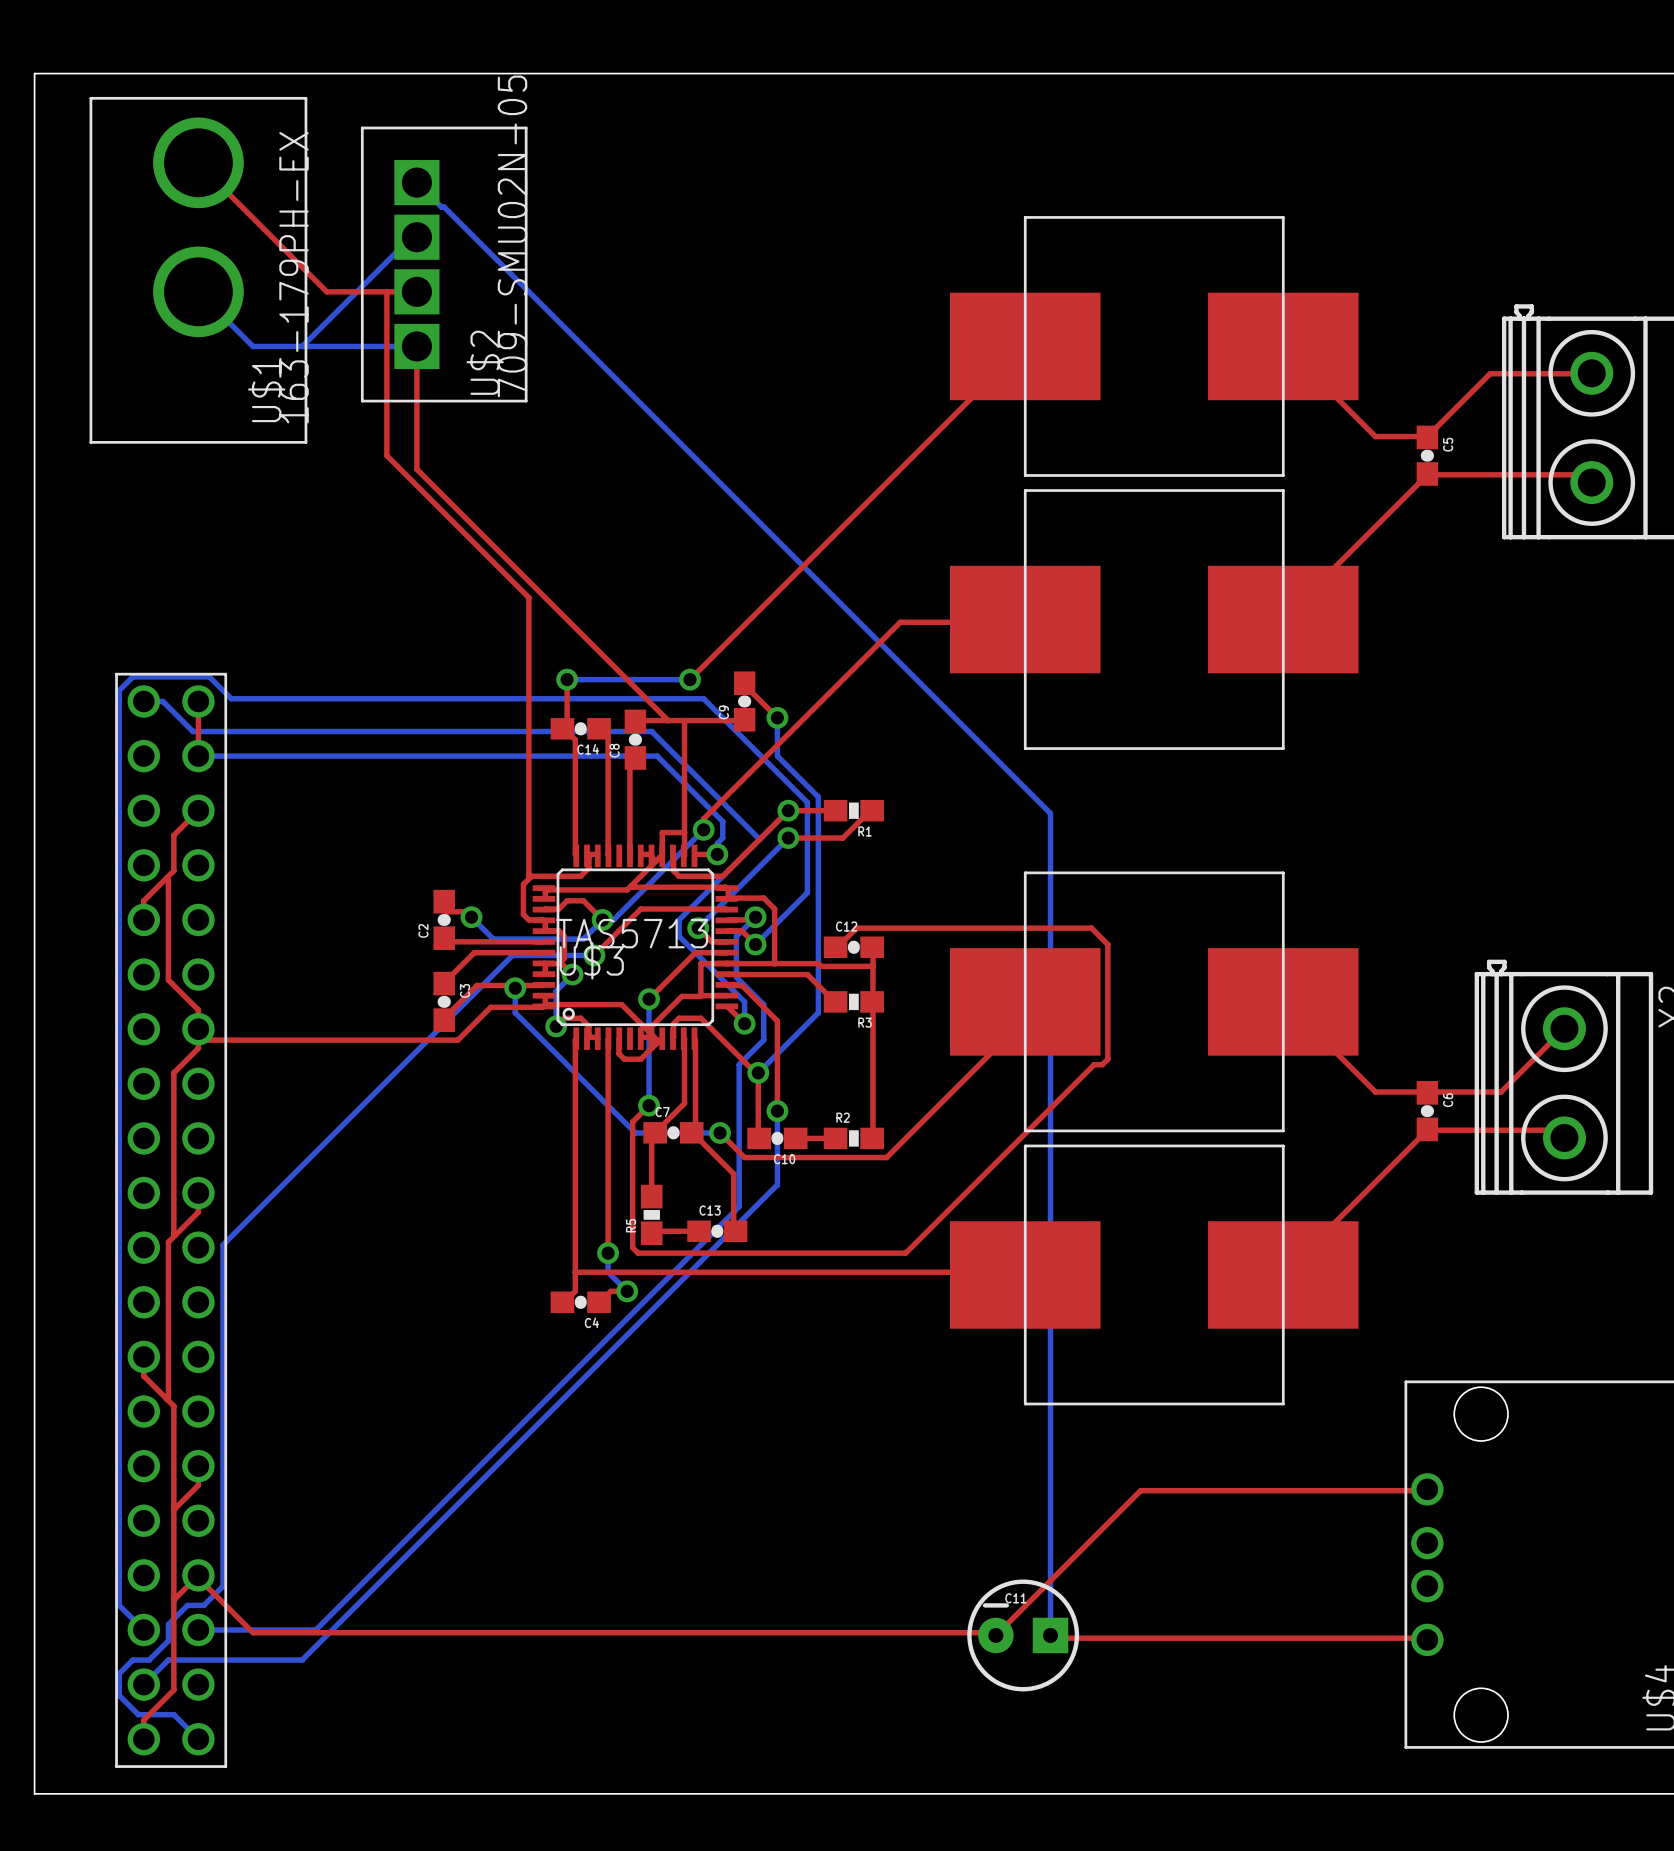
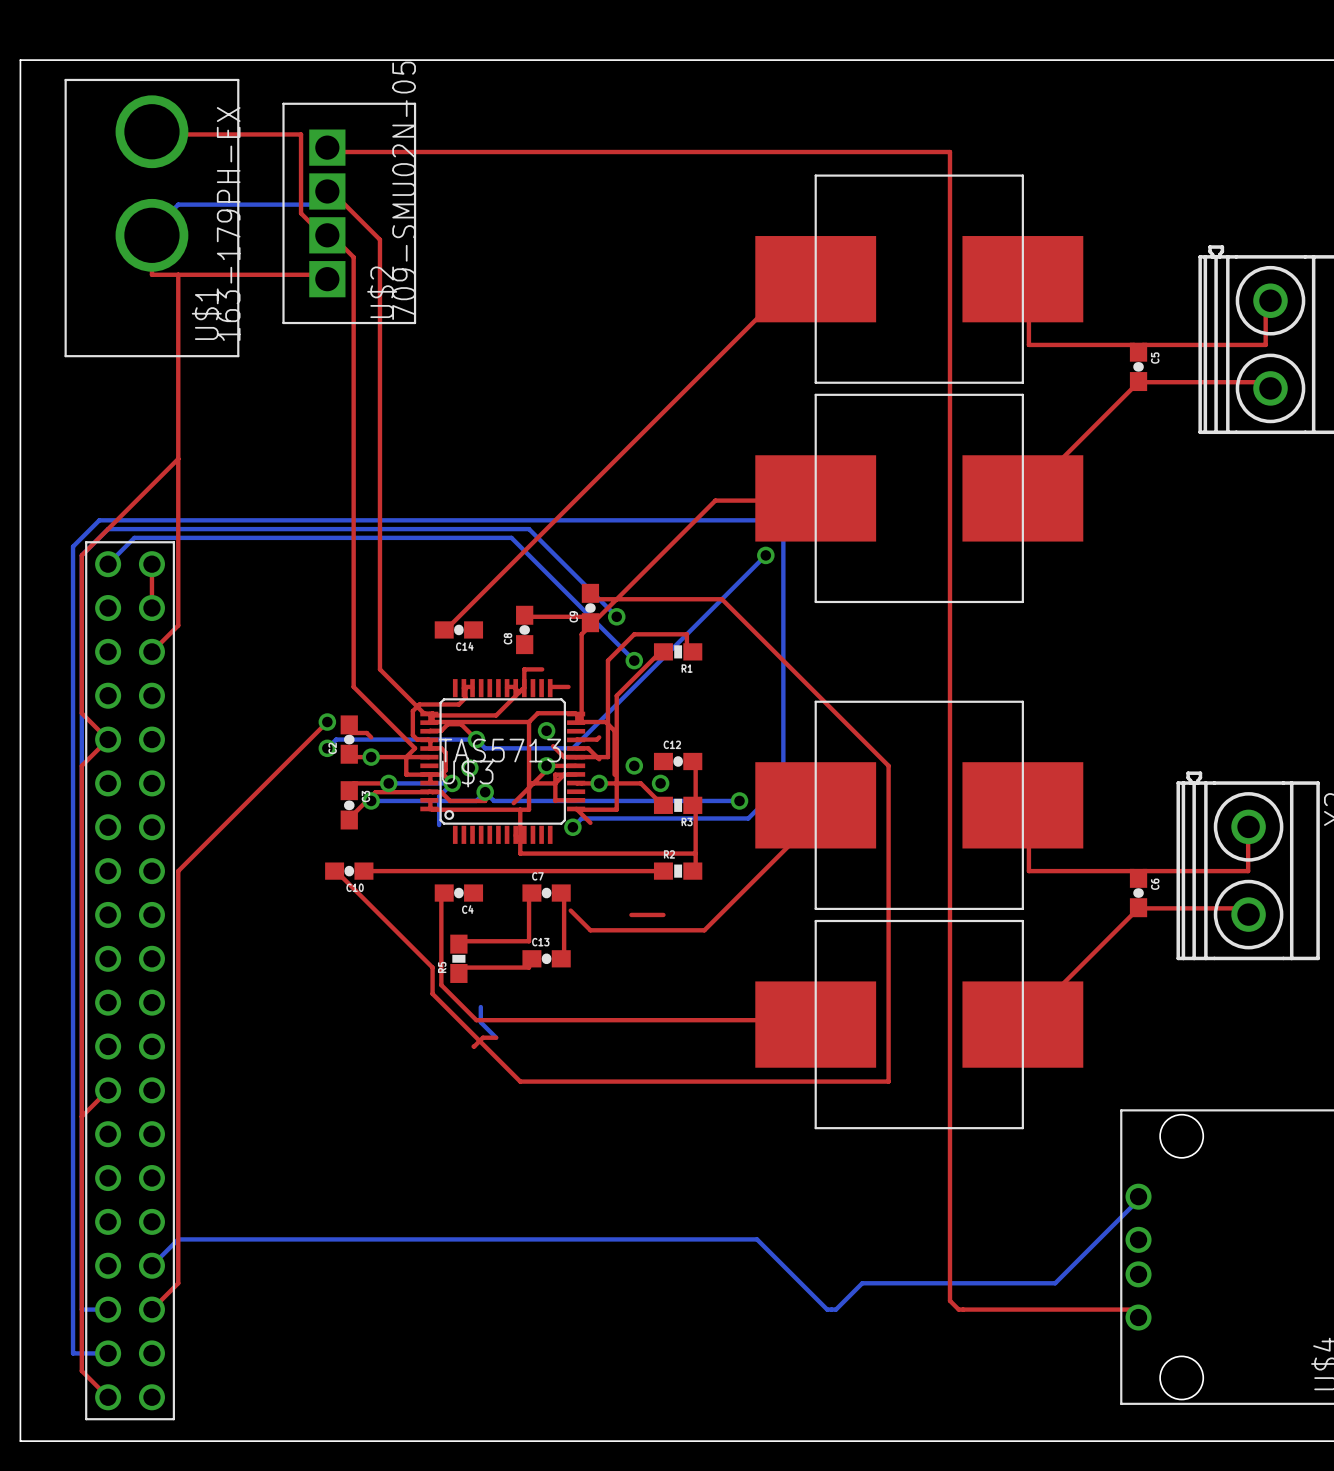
top track: (198, 163) (326, 291) (416, 291) -> (151, 132) (151, 134) (301, 134) (301, 213) (327, 239) (327, 230) (353, 257) (353, 686) (415, 748) (406, 757) (406, 774) (429, 774)
bottom track: (416, 182) (441, 207) (444, 207) (1050, 813) (1050, 1635) -> none
top track: none -> (327, 191) (327, 187) (379, 239) (379, 669) (423, 713) (432, 713) (432, 722) (529, 722)
bottom track: (416, 237) (411, 237) (302, 346) -> none
bottom track: (198, 291) (253, 346) (416, 346) -> (151, 235) (151, 230) (178, 204) (318, 204) (327, 195) (327, 191)
top track: (386, 291) (386, 455) (528, 597) (530, 877) -> none
top track: (416, 346) (416, 469) (668, 720) -> (327, 279) (327, 274) (151, 274) (151, 235)
top track: (1025, 346) (690, 679) -> (815, 279) (809, 283) (792, 283) (444, 629)
top track: (1283, 346) (1375, 436) (1427, 436) (1490, 373) (1591, 373) -> (1022, 279) (1028, 283) (1028, 344) (1134, 344) (1138, 352) (1142, 344) (1265, 344) (1265, 301) (1270, 300)
top track: (567, 679) (567, 728) (562, 728) -> none
bottom track: (567, 679) (690, 679) -> none
via: (567, 679) -> none
via: (690, 679) -> none
top track: (744, 683) (777, 717) -> none
bottom track: none -> (765, 555) (572, 748) (485, 748) (476, 739) (336, 739) (327, 748)
via: none -> (765, 555)
bottom track: (143, 701) (162, 701) (192, 731) (651, 731) (759, 839) -> (108, 564) (134, 537) (511, 537) (634, 660)
C9 position: (744, 701) -> (590, 608)
bottom track: (777, 717) (777, 756) (818, 797) (818, 1012) (758, 1072) -> none
via: (777, 717) -> none
top track: (744, 719) (635, 721) -> none
top track: (684, 720) (683, 855) -> none
top track: (564, 728) (575, 739) (576, 855) -> none
C14 position: (580, 728) -> (458, 629)
top track: (599, 728) (608, 736) (608, 855) -> none
C8 position: (635, 739) -> (524, 629)
bottom track: (198, 756) (657, 756) (722, 821) (722, 838) (717, 843) (717, 854) -> none
top track: (635, 757) (629, 764) (630, 855) -> none
top track: none -> (524, 615) (590, 616) (590, 625)
via: none -> (616, 616)
top track: (733, 788) (703, 818) (703, 829) -> (581, 634) (581, 722) (576, 722)
top track: (198, 810) (173, 835) (173, 870) (143, 900) (143, 919) -> (151, 651) (178, 625) (178, 274)
bottom track: (788, 810) (679, 919) (679, 936) (744, 1001) (744, 1023) -> none
via: (788, 810) -> none
top track: (832, 810) (788, 810) (722, 876) (679, 876) (673, 870) (673, 855) -> (660, 651) (616, 695) (616, 809) (576, 808)
top track: (870, 810) (842, 838) (788, 838) -> (691, 651) (686, 651) (686, 634) (634, 634) (607, 660) (607, 757) (576, 757)
via: none -> (634, 660)
bottom track: (703, 829) (613, 919) (602, 919) (583, 939) (493, 939) (471, 917) -> none
via: (703, 829) -> none
bottom track: (788, 838) (698, 928) -> none
via: (788, 838) -> none
via: (717, 854) -> none
top track: (167, 877) (168, 980) (198, 1010) (198, 1048) (173, 1072) (175, 1235) -> none
top track: (631, 885) (679, 887) -> (529, 722) (537, 713)
top track: none -> (327, 722) (178, 871) (178, 1283) (151, 1309)
via: none -> (327, 722)
top track: none -> (529, 722) (529, 809) (429, 808)
top track: (726, 909) (640, 909) (594, 955) -> none
via position: (471, 917) -> (371, 757)
bottom track: (755, 917) (736, 936) (736, 977) (763, 1004) (763, 1040) (739, 1064) (739, 1206) (315, 1630) (198, 1630) -> none
via: (755, 917) -> none
via position: (698, 928) -> (546, 730)
top track: (1091, 928) (856, 928) (835, 947) -> (868, 746) (721, 599) (590, 599) (590, 593)
via: none -> (327, 748)
bottom track: (755, 944) (807, 892) (807, 802) (703, 698) (231, 698) (209, 676) (132, 676) (119, 690) (119, 1605) (143, 1630) -> (616, 616) (529, 529) (108, 529) (81, 555) (81, 1309) (108, 1309)
via: (755, 944) -> none
top track: (1107, 944) (1107, 1059) (1102, 1064) (1094, 1064) (905, 1253) (638, 1253) (632, 1247) (632, 1122) (649, 1105) -> (882, 759) (888, 765) (888, 1081) (520, 1081) (432, 993) (432, 967) (334, 871)
top track: (872, 947) (872, 1138) -> (692, 761) (695, 765) (695, 800) (692, 805) (695, 809) (695, 871) (692, 871)
top track: (544, 952) (474, 952) (444, 983) -> (388, 783) (353, 783) (349, 790)
via: none -> (546, 765)
via: none -> (634, 765)
bottom track: (594, 955) (512, 955) (223, 1244) (223, 1586) (203, 1605) (187, 1605) (168, 1624) (168, 1640) (149, 1660) (132, 1660) (119, 1673) (119, 1695) (138, 1714) (173, 1714) (198, 1739) -> none
top track: none -> (564, 774) (555, 783) (529, 783)
top track: (726, 963) (818, 963) (821, 966) (872, 966) -> none
bottom track: none -> (388, 783) (458, 783)
via: none -> (388, 783)
via: none -> (599, 783)
via: none -> (660, 783)
top track: none -> (429, 791) (441, 792) (450, 800) (485, 800) (485, 792)
top track: (726, 984) (741, 985) (777, 1021) (777, 1111) -> none
via: none -> (485, 792)
bottom track: (515, 988) (515, 1012) (635, 1132) (720, 1132) -> none
via: (515, 988) -> none
bottom track: none -> (371, 800) (476, 800) (485, 792) (493, 800) (739, 800)
via: none -> (371, 800)
top track: (700, 996) (681, 996) (649, 1029) (651, 1038) (640, 1038) -> none
via: none -> (739, 800)
bottom track: (649, 999) (649, 1105) -> none
via: (649, 999) -> none
top track: (1283, 1001) (1375, 1092) (1501, 1092) (1563, 1029) -> (1022, 805) (1028, 809) (1028, 871) (1134, 871) (1138, 878) (1142, 871) (1248, 871) (1248, 827)
top track: none -> (520, 809) (520, 853) (695, 853)
via position: (744, 1023) -> (572, 827)
top track: (556, 1026) (564, 1018) (580, 1018) (588, 1026) (587, 1038) (597, 1038) -> none
via: (556, 1026) -> none
top track: (576, 1038) (575, 1291) (562, 1302) -> none
top track: (608, 1038) (608, 1253) -> none
top track: (619, 1038) (619, 1053) (624, 1059) (640, 1059) (662, 1038) -> none
top track: (673, 1038) (673, 1023) (679, 1018) (700, 1018) (758, 1075) (759, 1138) -> none
top track: (683, 1038) (684, 1103) (651, 1135) (651, 1196) -> none
top track: (694, 1038) (695, 1127) (691, 1132) (733, 1173) (733, 1231) (735, 1231) -> none
top track: (198, 1040) (457, 1040) (490, 1007) (542, 1007) (548, 1004) (621, 1004) (658, 1041) -> none
via: (758, 1072) -> none
top track: none -> (363, 871) (663, 871)
via: (649, 1105) -> none
top track: none -> (531, 893) (529, 897) (529, 941) (458, 941) (458, 944)
top track: none -> (561, 893) (564, 897) (564, 958) (561, 958)
bottom track: (777, 1111) (777, 1184) (302, 1660) (168, 1660) (143, 1684) -> (572, 827) (581, 818) (748, 818) (783, 783) (783, 520) (99, 520) (73, 546) (73, 1353) (108, 1353)
via: (777, 1111) -> none
C7 position: (673, 1132) -> (546, 893)
via: (720, 1132) -> none
C10 position: (777, 1138) -> (349, 871)
R2 position: (853, 1138) -> (678, 871)
top track: (198, 1193) (198, 1212) (168, 1242) (167, 1399) -> none
top track: none -> (531, 958) (529, 958) (529, 967) (458, 967) (458, 973)
R5 position: (651, 1214) -> (458, 958)
top track: (699, 1231) (651, 1231) (651, 1233) -> none
C13 position: (717, 1231) -> (546, 958)
via: (608, 1253) -> none
top track: (575, 1272) (1020, 1272) (1025, 1274) -> (444, 893) (441, 897) (441, 985) (476, 1020) (809, 1020) (815, 1024)
via: (627, 1291) -> none
C4 position: (580, 1302) -> (458, 893)
top track: (143, 1356) (143, 1376) (173, 1406) (175, 1508) -> (108, 1090) (81, 1116)
top track: (198, 1466) (198, 1485) (173, 1509) (175, 1598) -> none
top track: (1427, 1489) (1140, 1490) (995, 1635) (995, 1632) (253, 1632) (198, 1578) (198, 1575) (173, 1599) (173, 1690) (143, 1720) (143, 1739) -> (178, 458) (81, 555) (81, 713) (108, 739) (81, 765) (81, 1370) (108, 1397)
bottom track: none -> (1138, 1196) (1134, 1204) (1055, 1283) (862, 1283) (835, 1309) (827, 1309) (757, 1239) (178, 1239) (151, 1265)
C11: (1023, 1635) -> none
top track: (1050, 1635) (1053, 1638) (1427, 1638) (1427, 1639) -> (327, 147) (327, 152) (949, 152) (949, 1300) (958, 1309) (1134, 1309) (1138, 1317)

